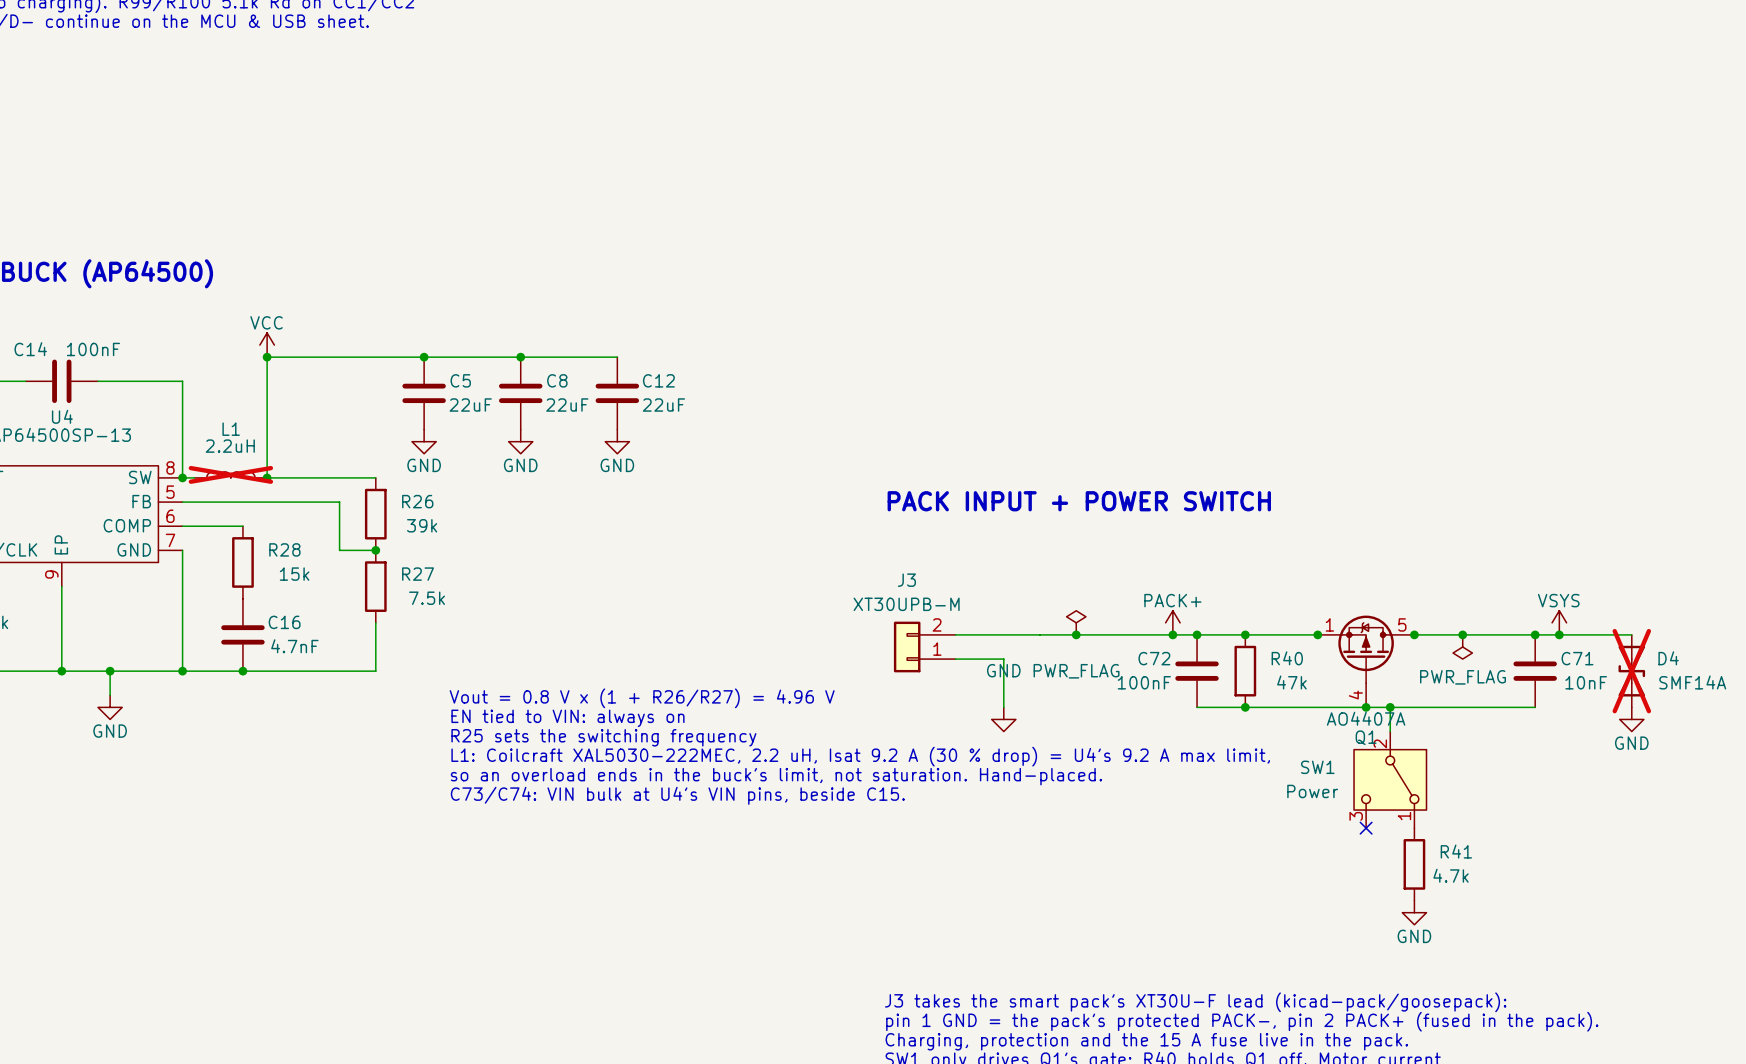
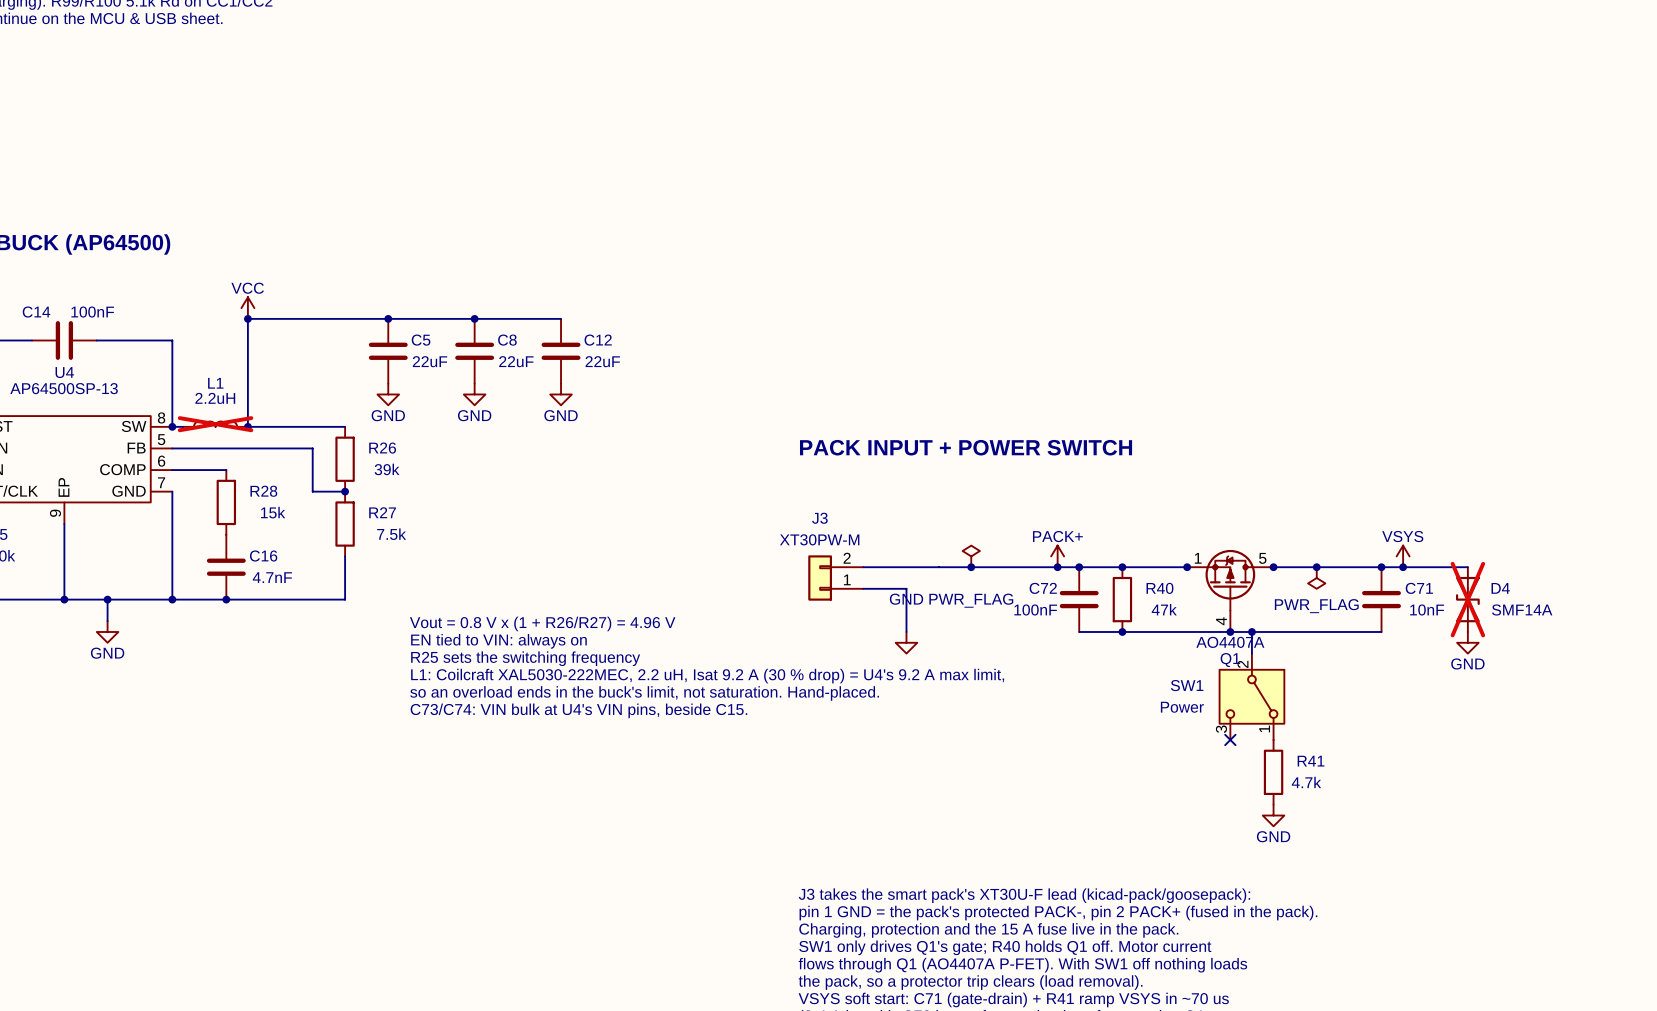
J3 value: XT30UPB-M (906, 604) -> XT30PW-M (819, 539)

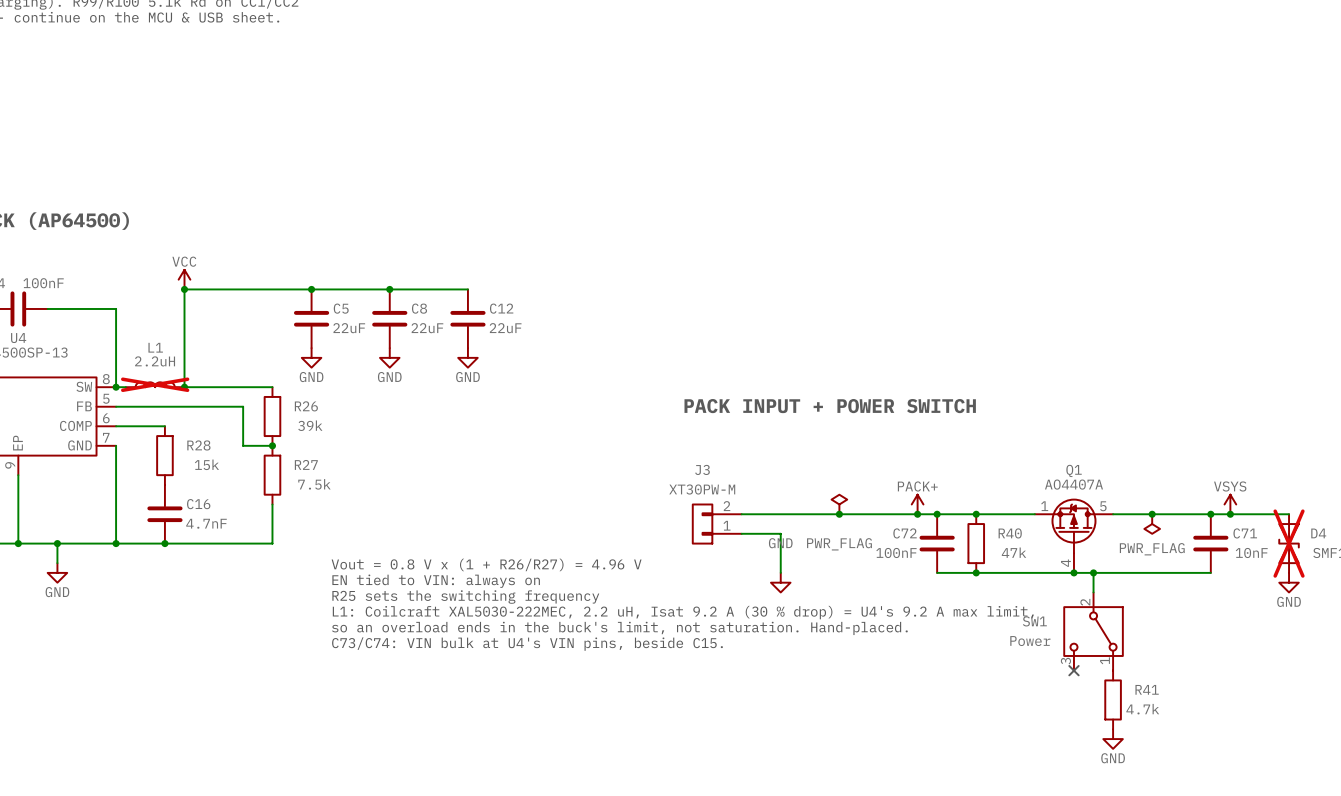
junction: (1187, 567) -> none
junction: (1273, 567) -> none
Q1 value position: AO4407A (1230, 642) -> AO4407A (1073, 484)
Q1 name position: Q1 (1230, 660) -> Q1 (1074, 470)

